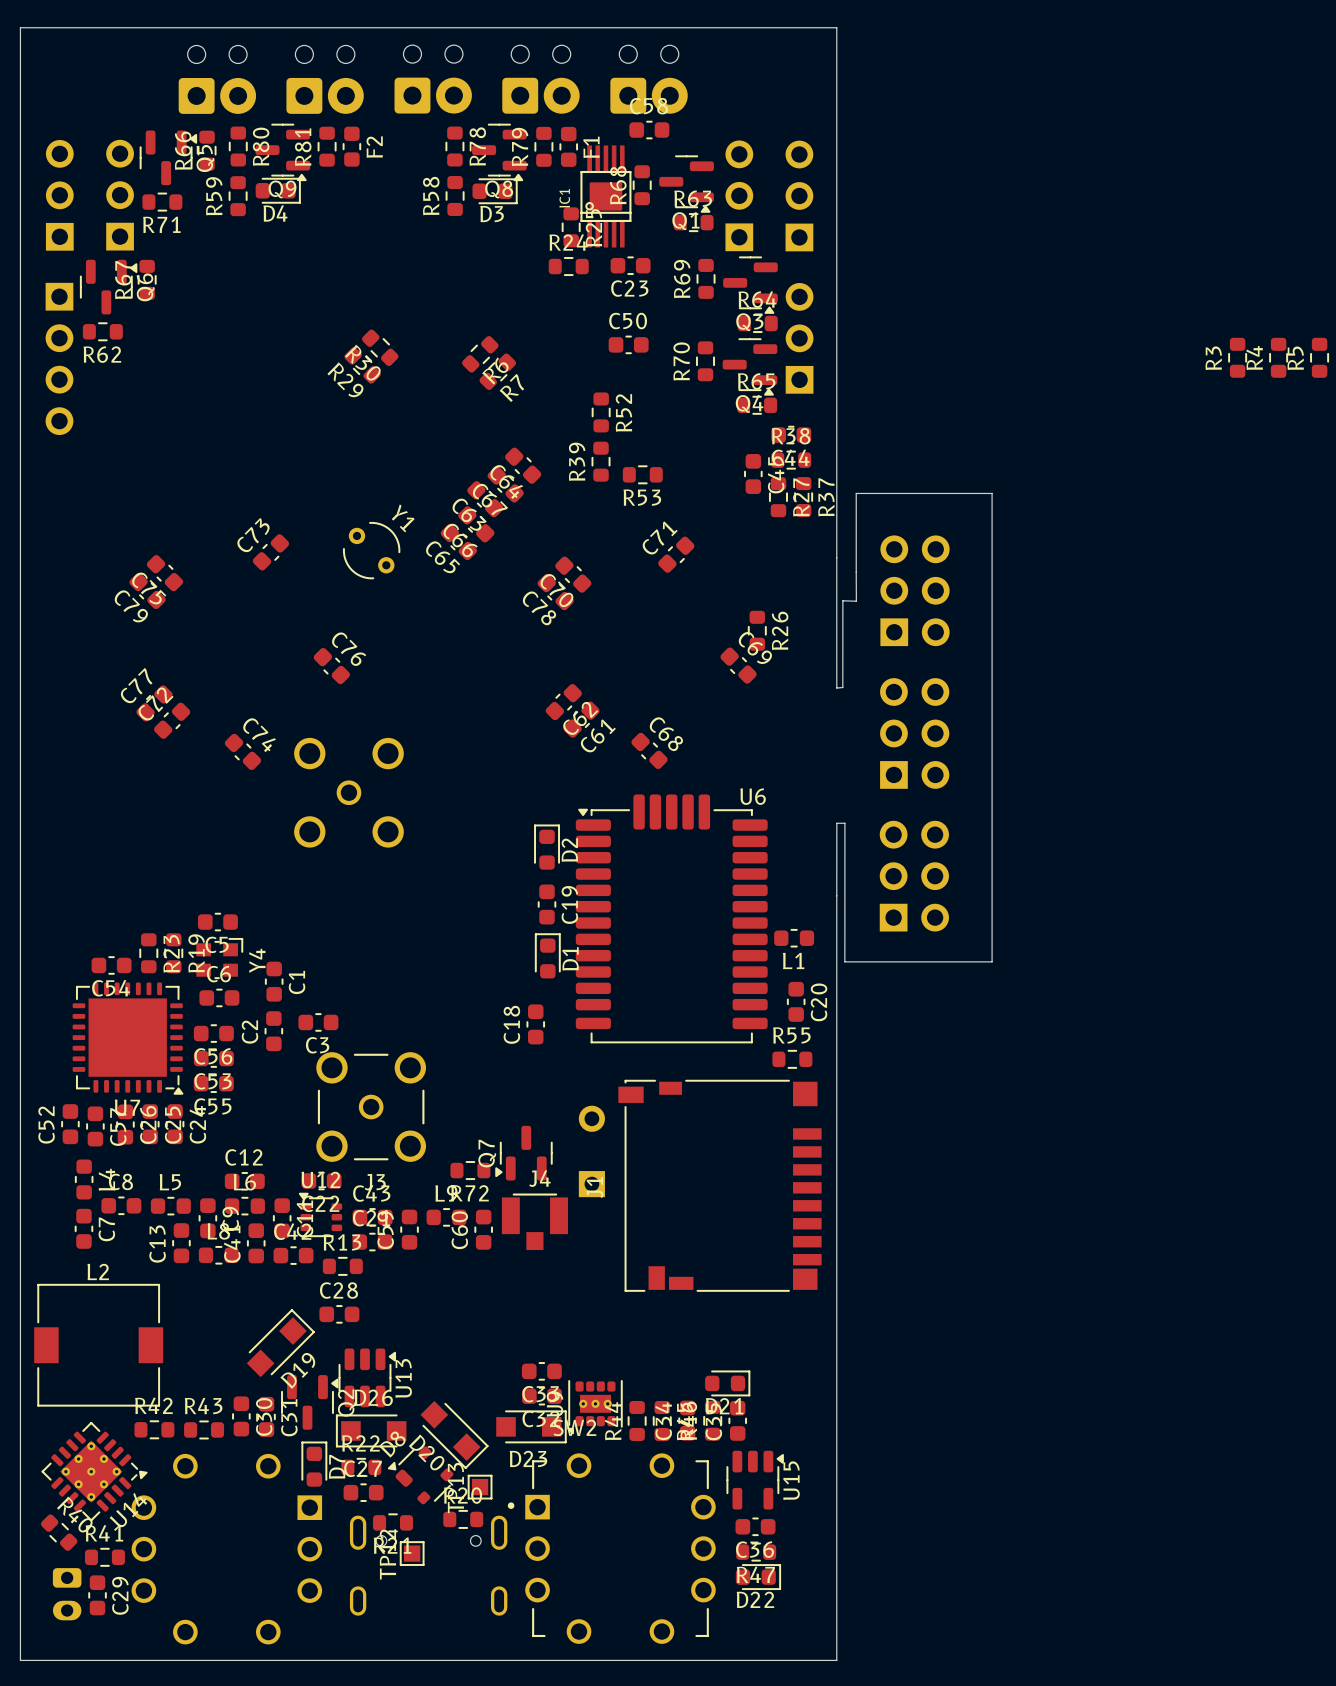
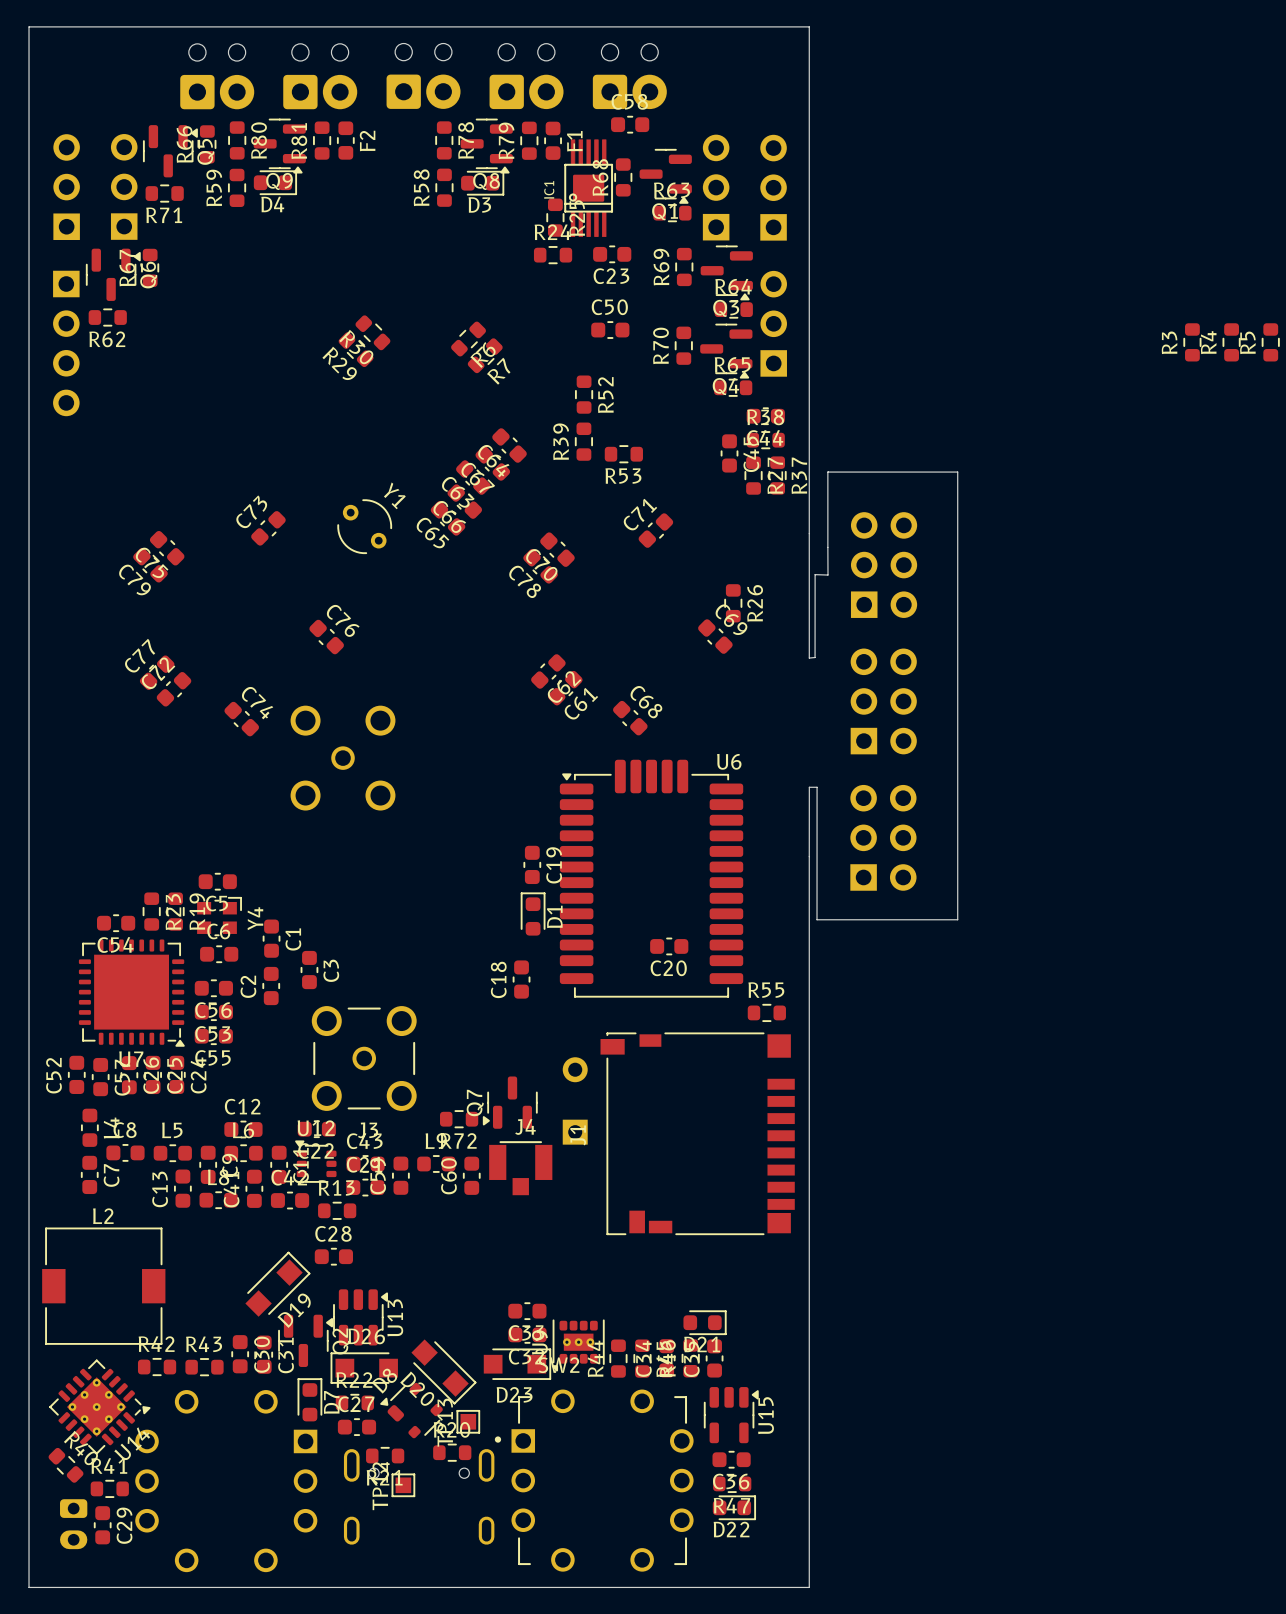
D2: (547, 847) -> none
L1: (794, 938) -> none
C20 rotation: 0° (796, 1001) -> 90° clockwise (669, 946)
C20 position: (796, 1001) -> (669, 946)
C3 rotation: 0° (318, 1022) -> 90° clockwise (309, 970)
C3 name position: C3 (317, 1045) -> C3 (331, 970)

